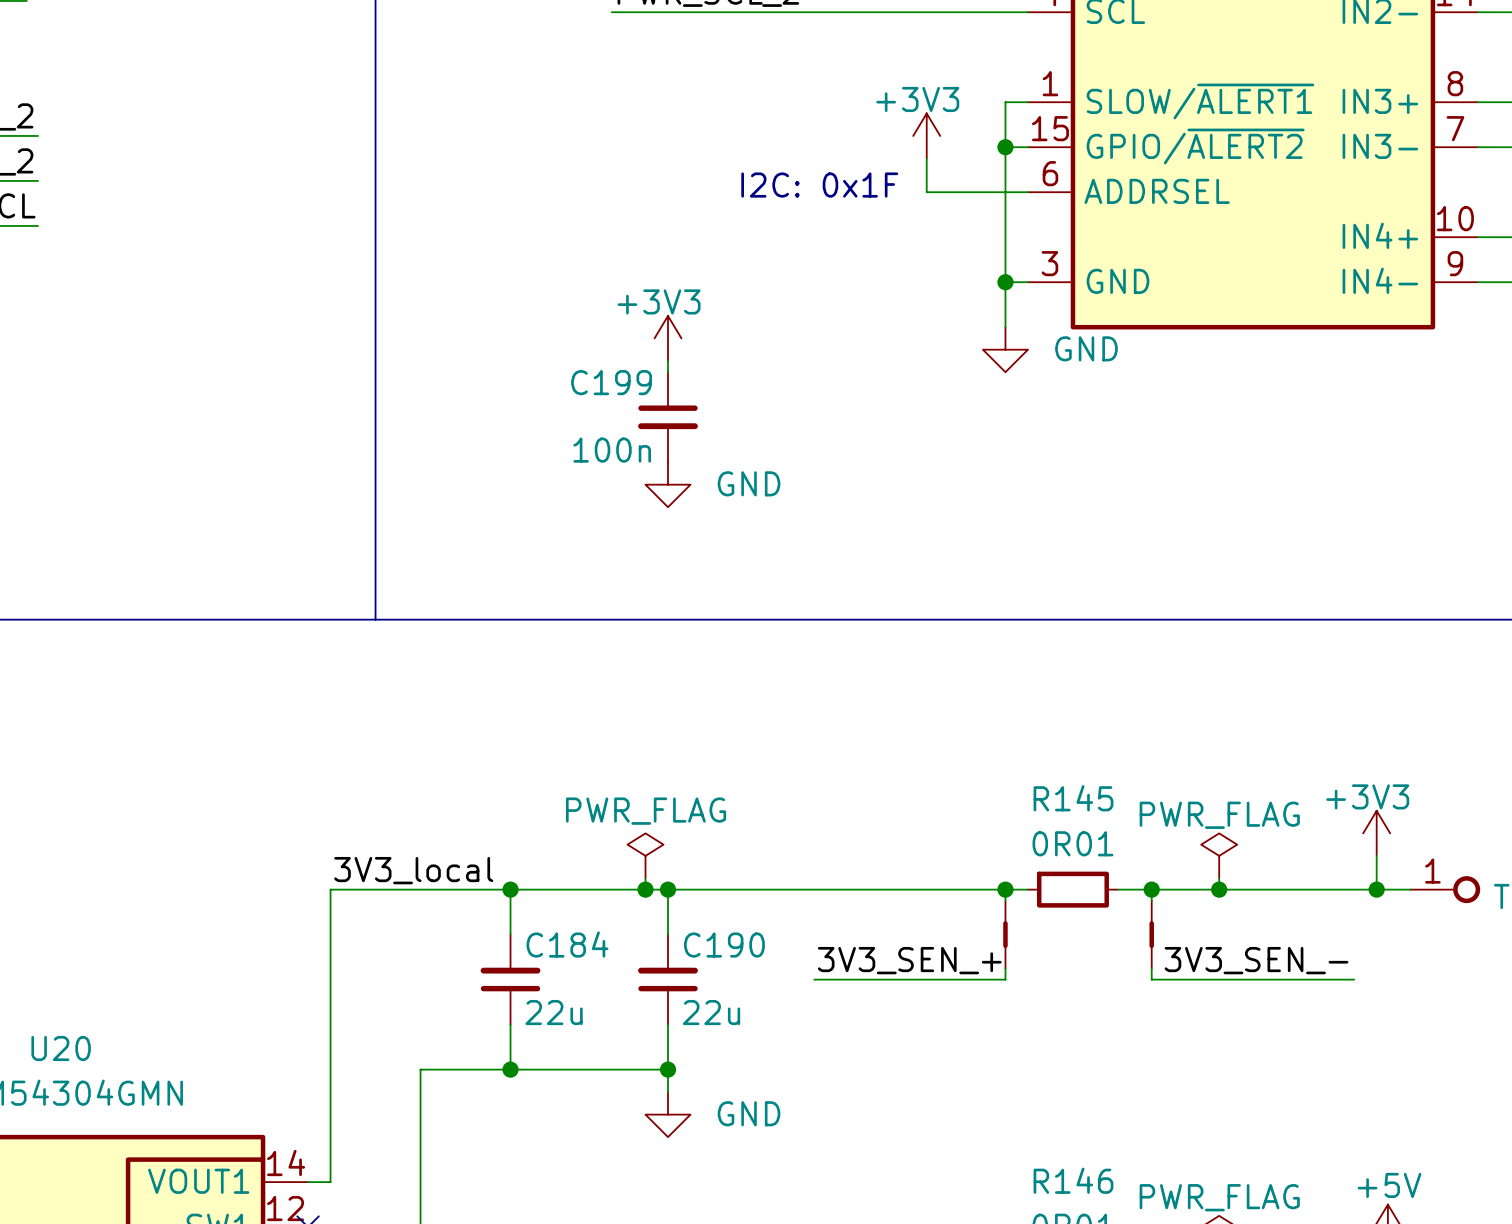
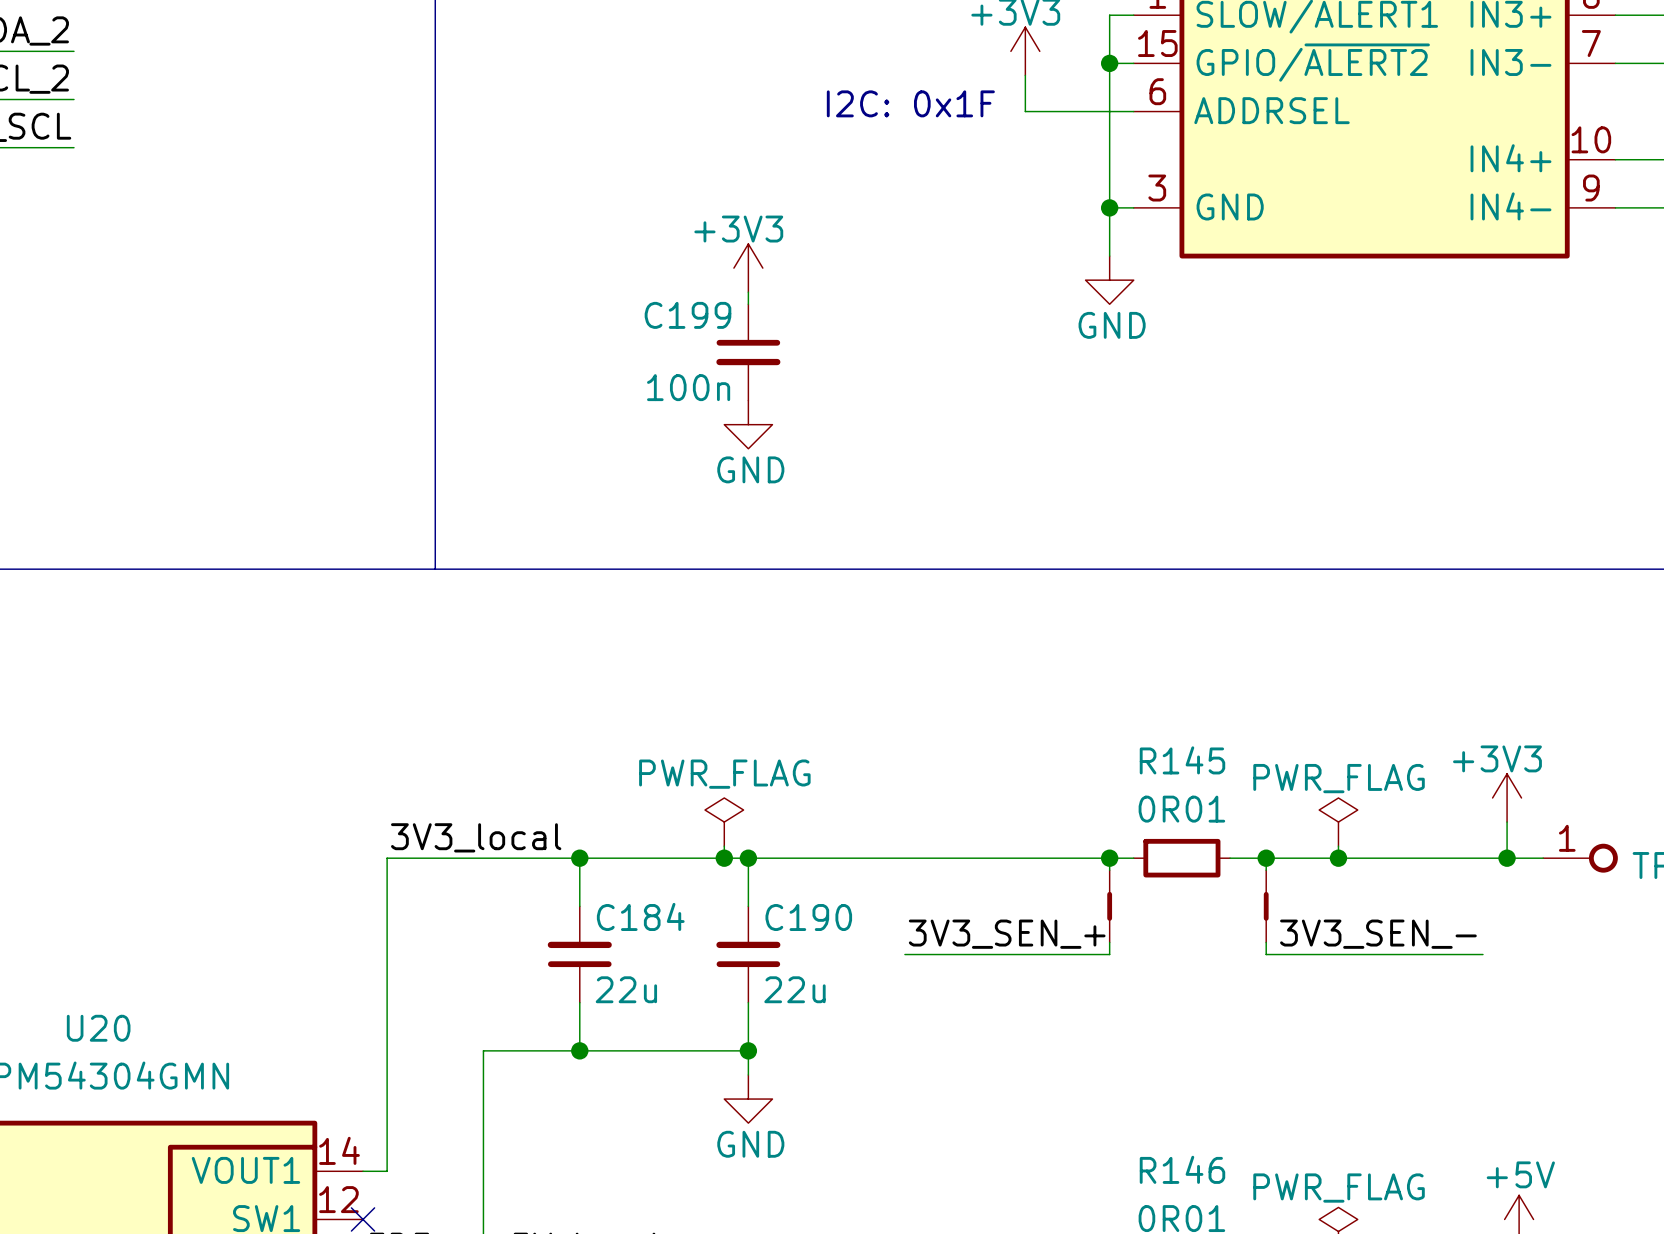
power symbol text position: GND (1086, 348) -> GND (1112, 325)
power symbol text position: GND (749, 483) -> GND (750, 469)
power symbol text position: GND (749, 1113) -> GND (750, 1144)

